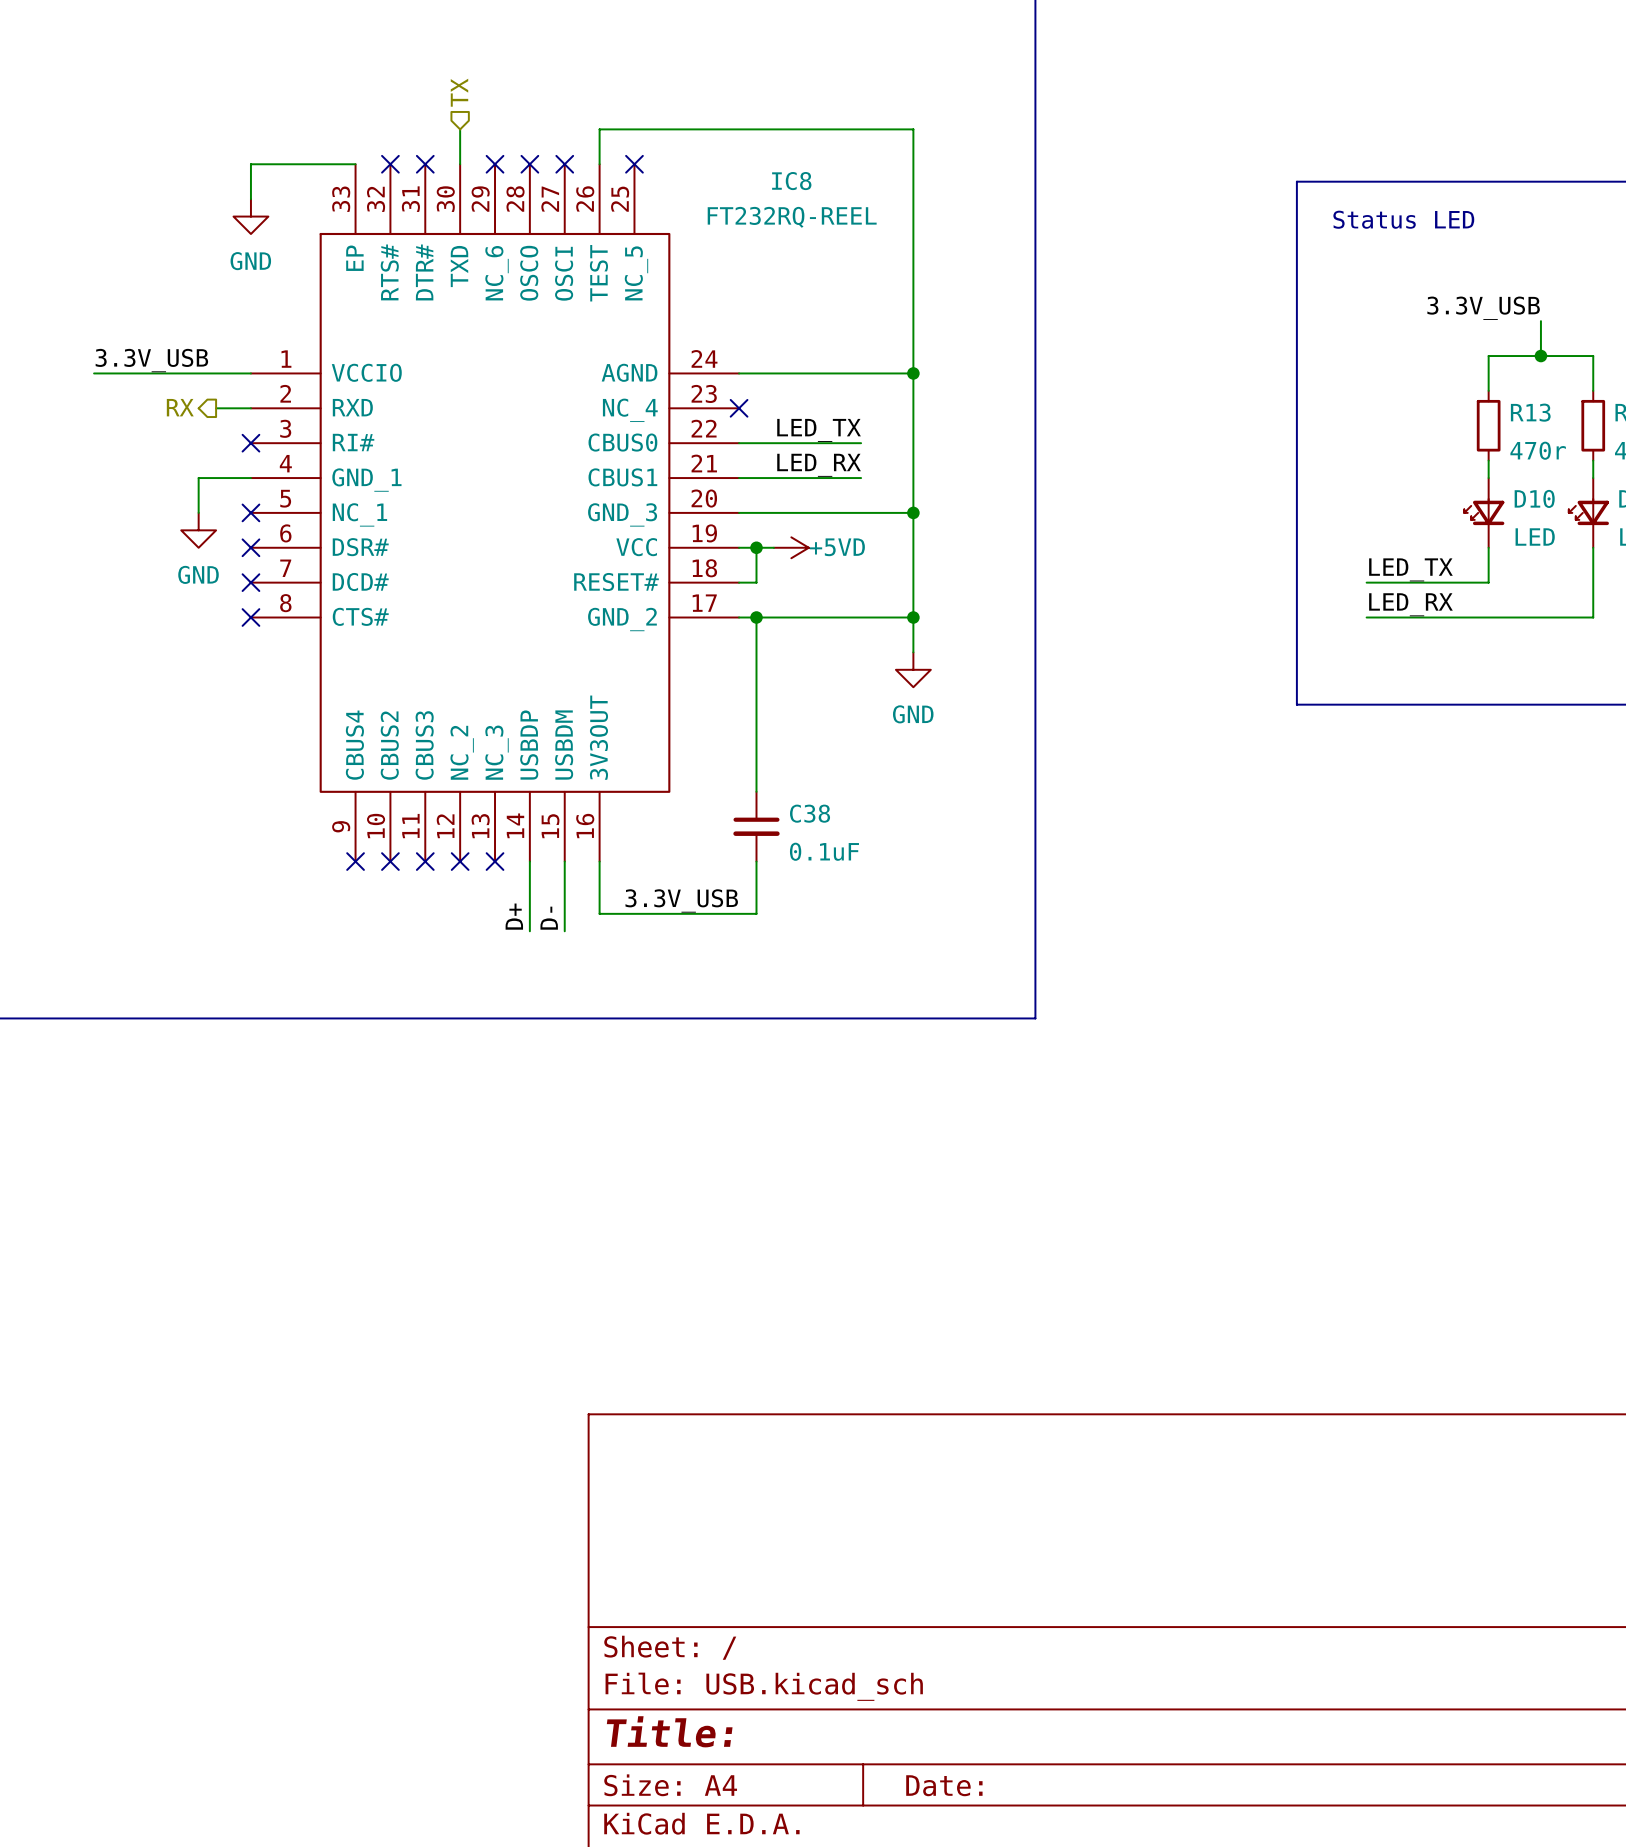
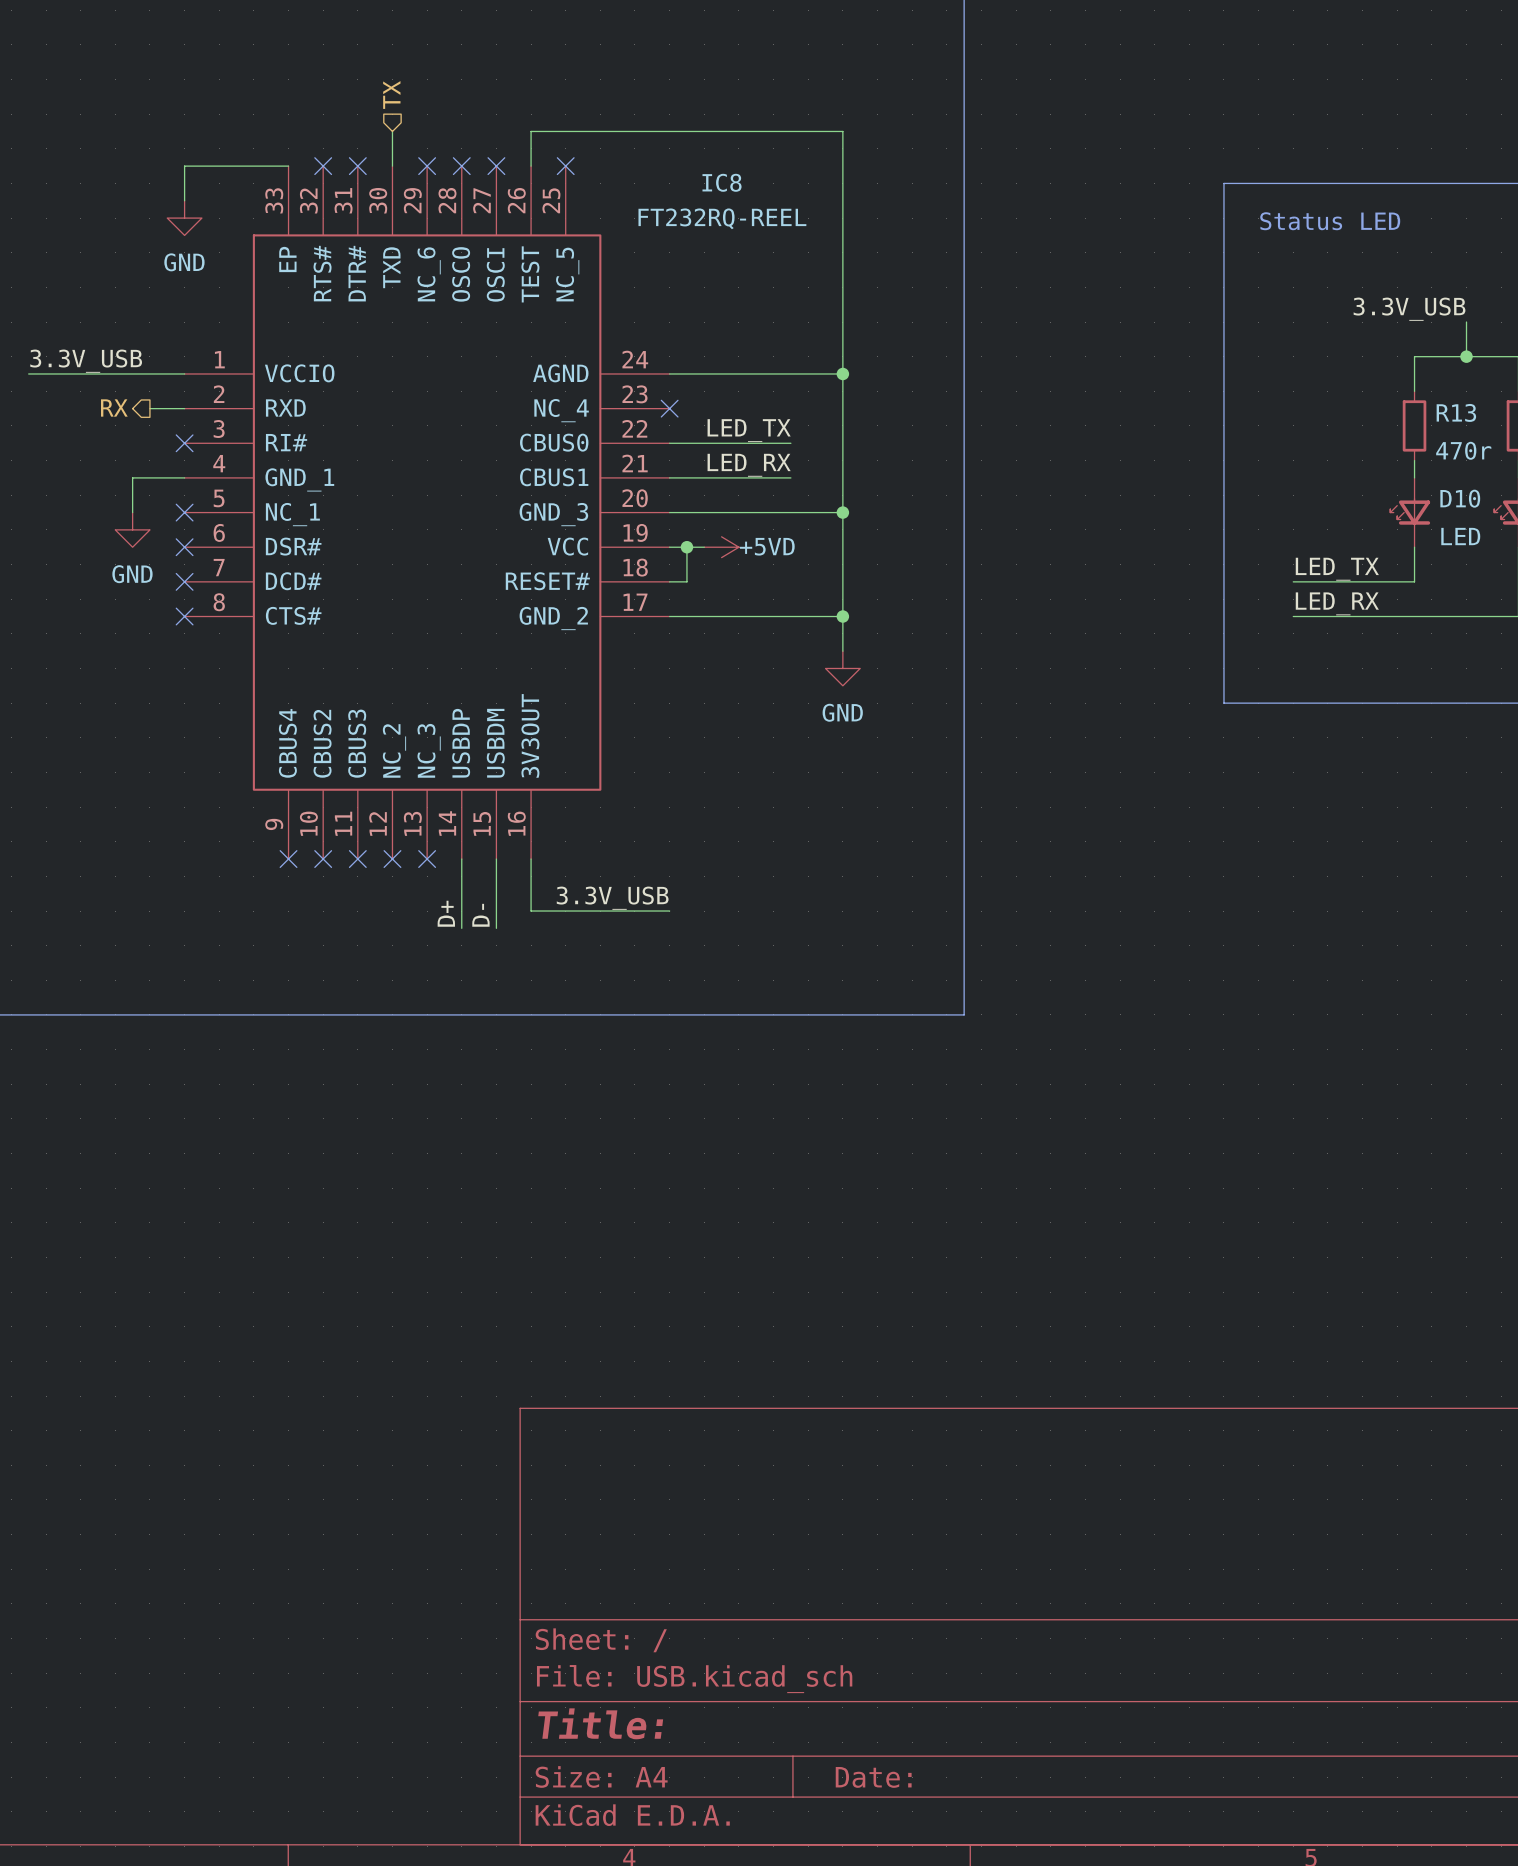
wire: (756, 617) (756, 791) -> none
junction: (756, 617) -> none
C38: 0.1uF (756, 826) -> none
wire: (756, 861) (756, 913) (739, 913) -> none

